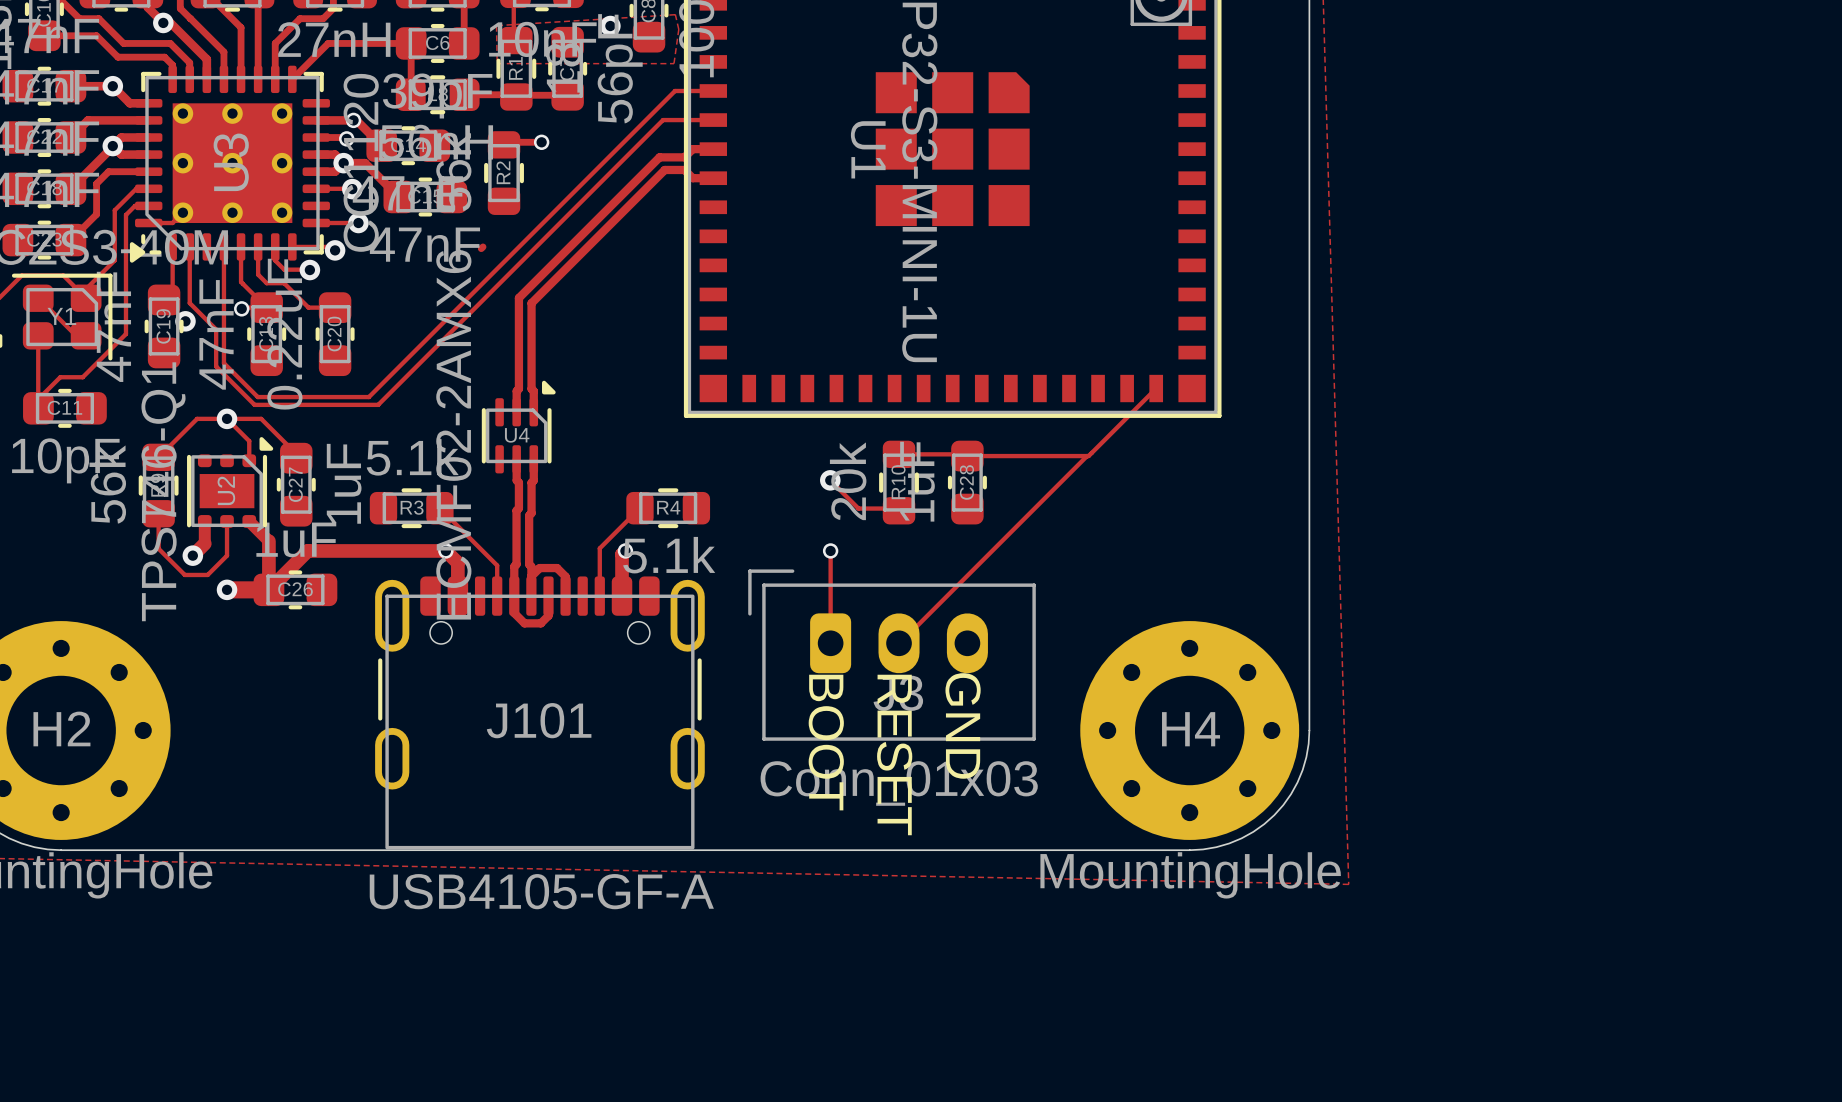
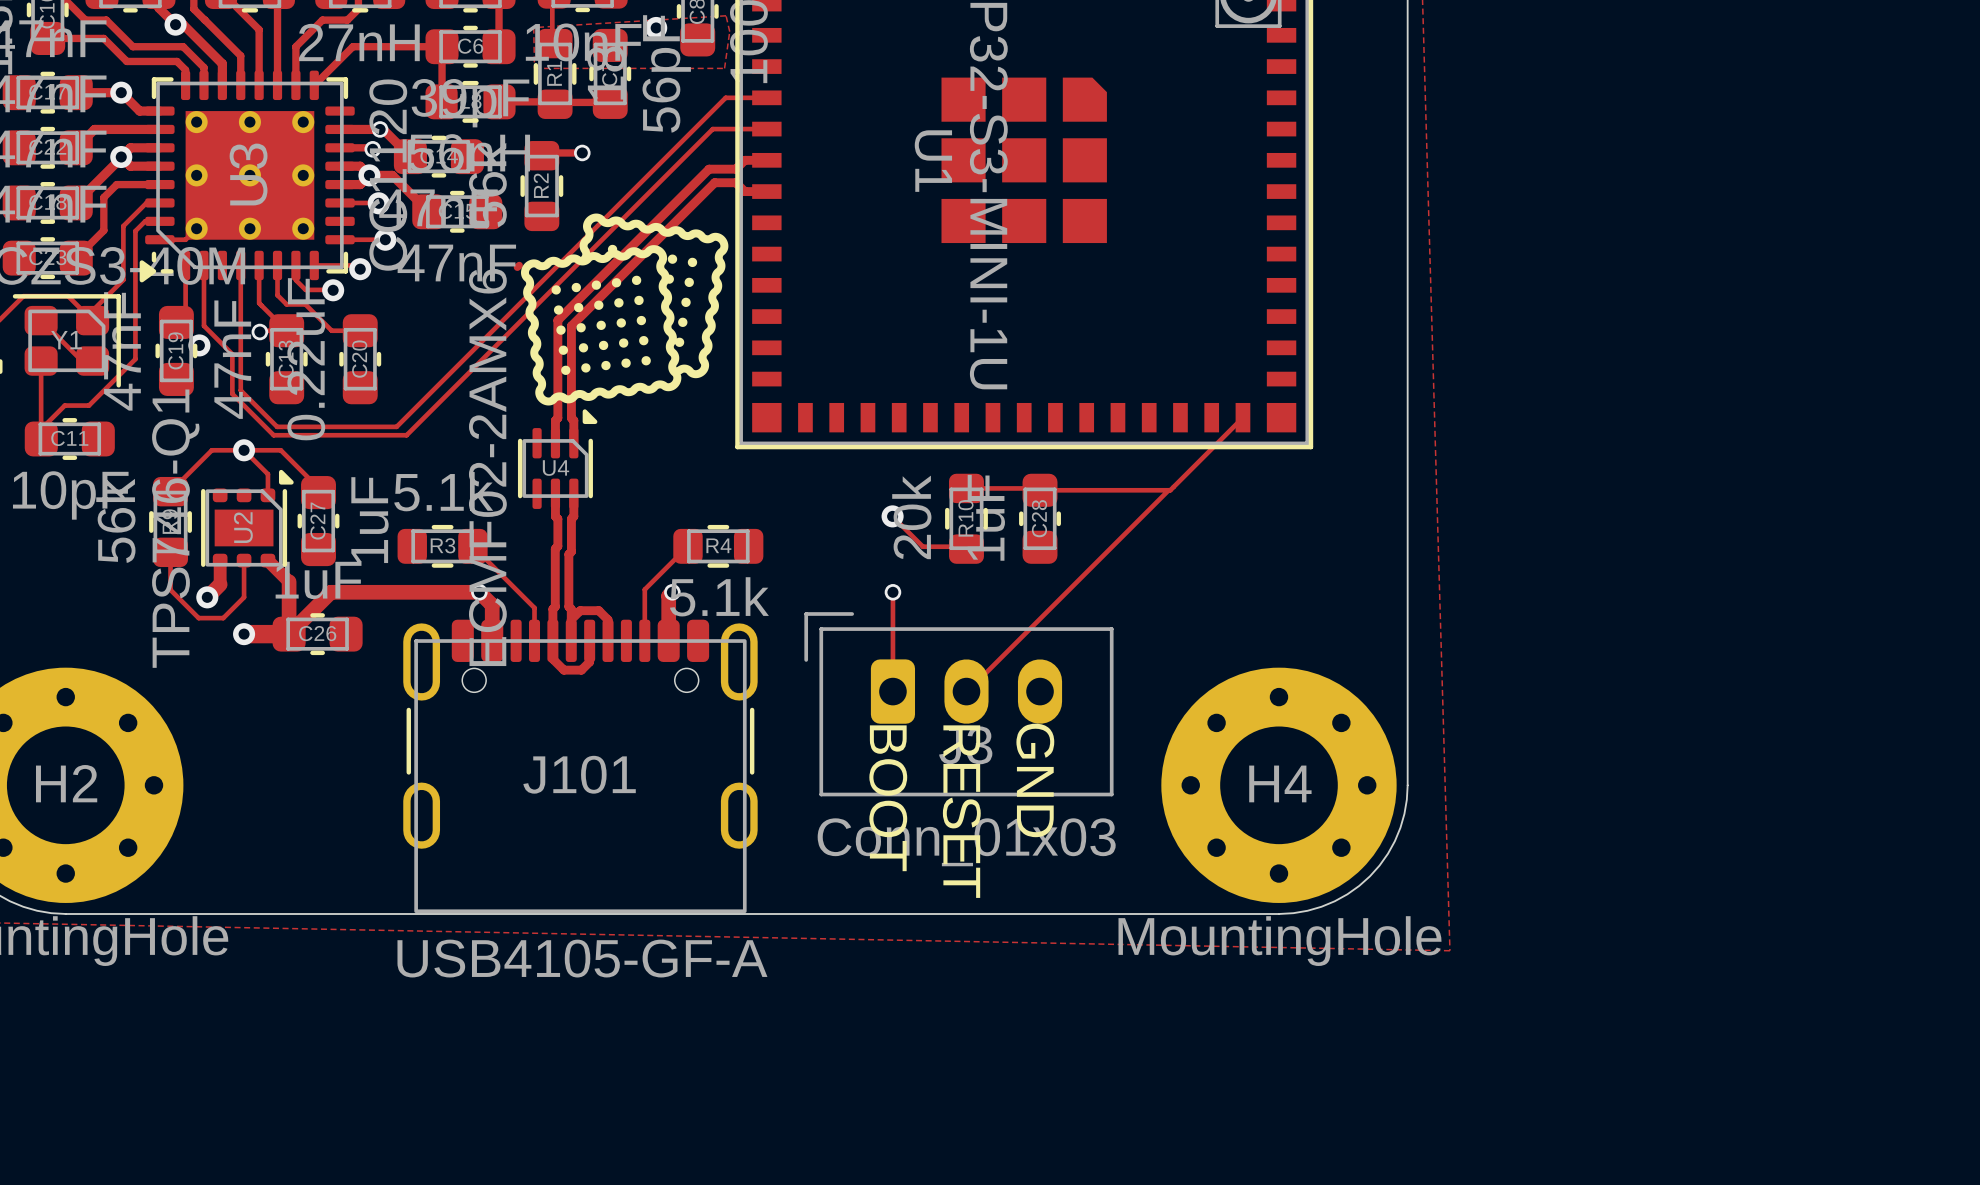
drawing: none -> [521, 213, 729, 406]

